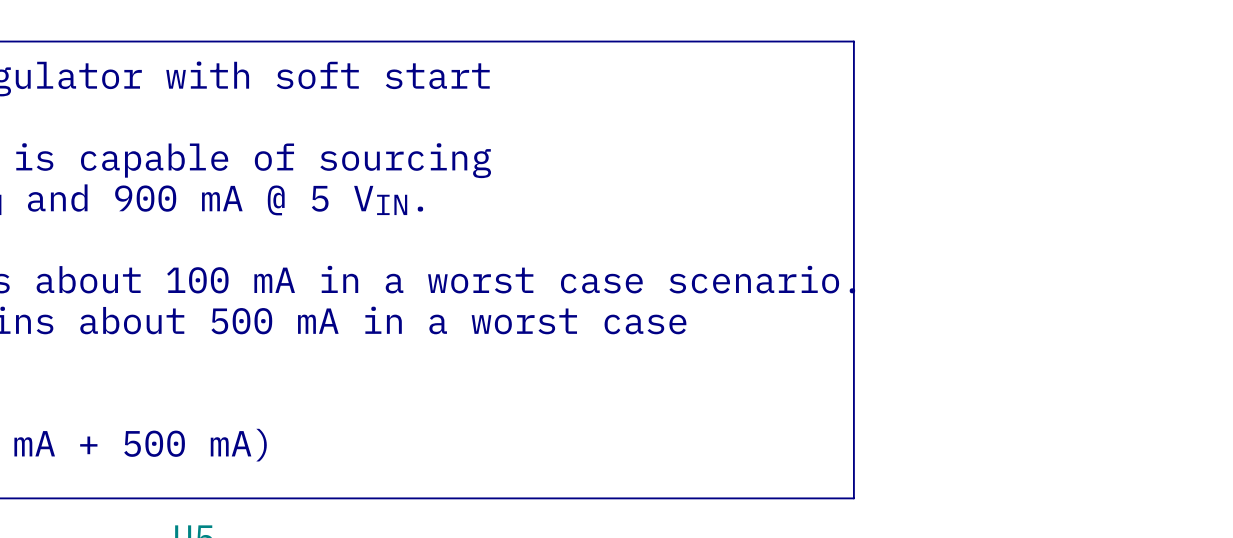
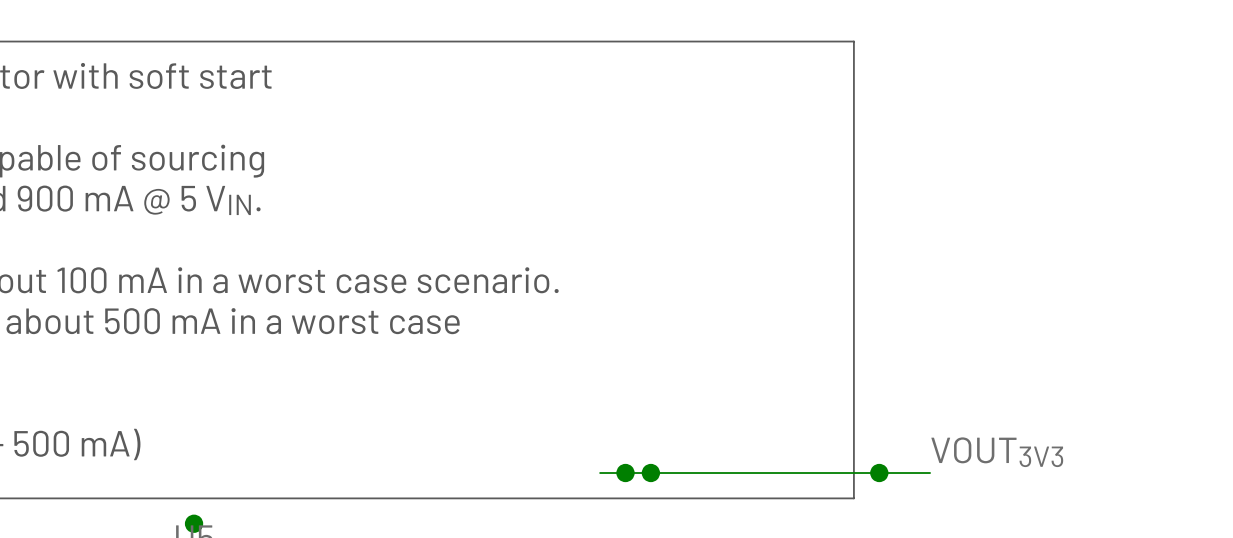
label: none -> VOUT3V3 (997, 452)
wire: none -> (600, 473) (930, 473)
junction: none -> (625, 473)
junction: none -> (650, 473)
junction: none -> (879, 473)
junction: none -> (194, 523)

